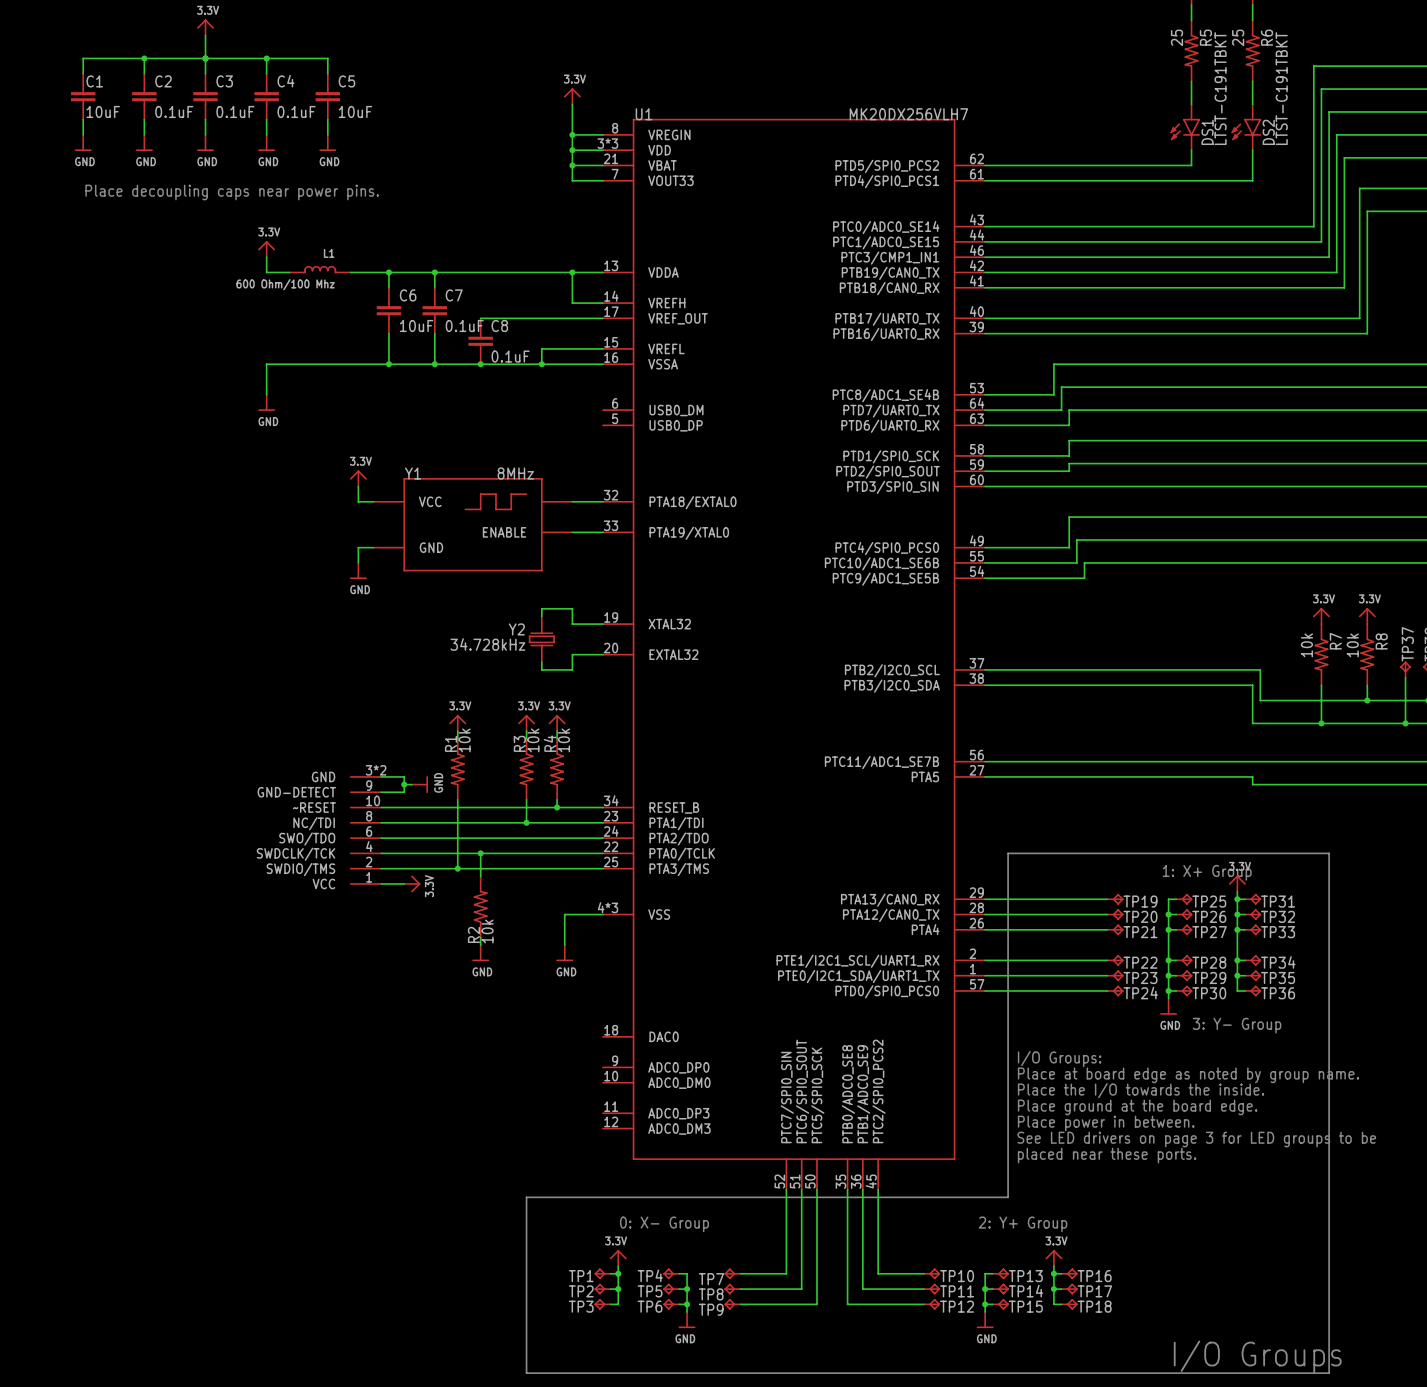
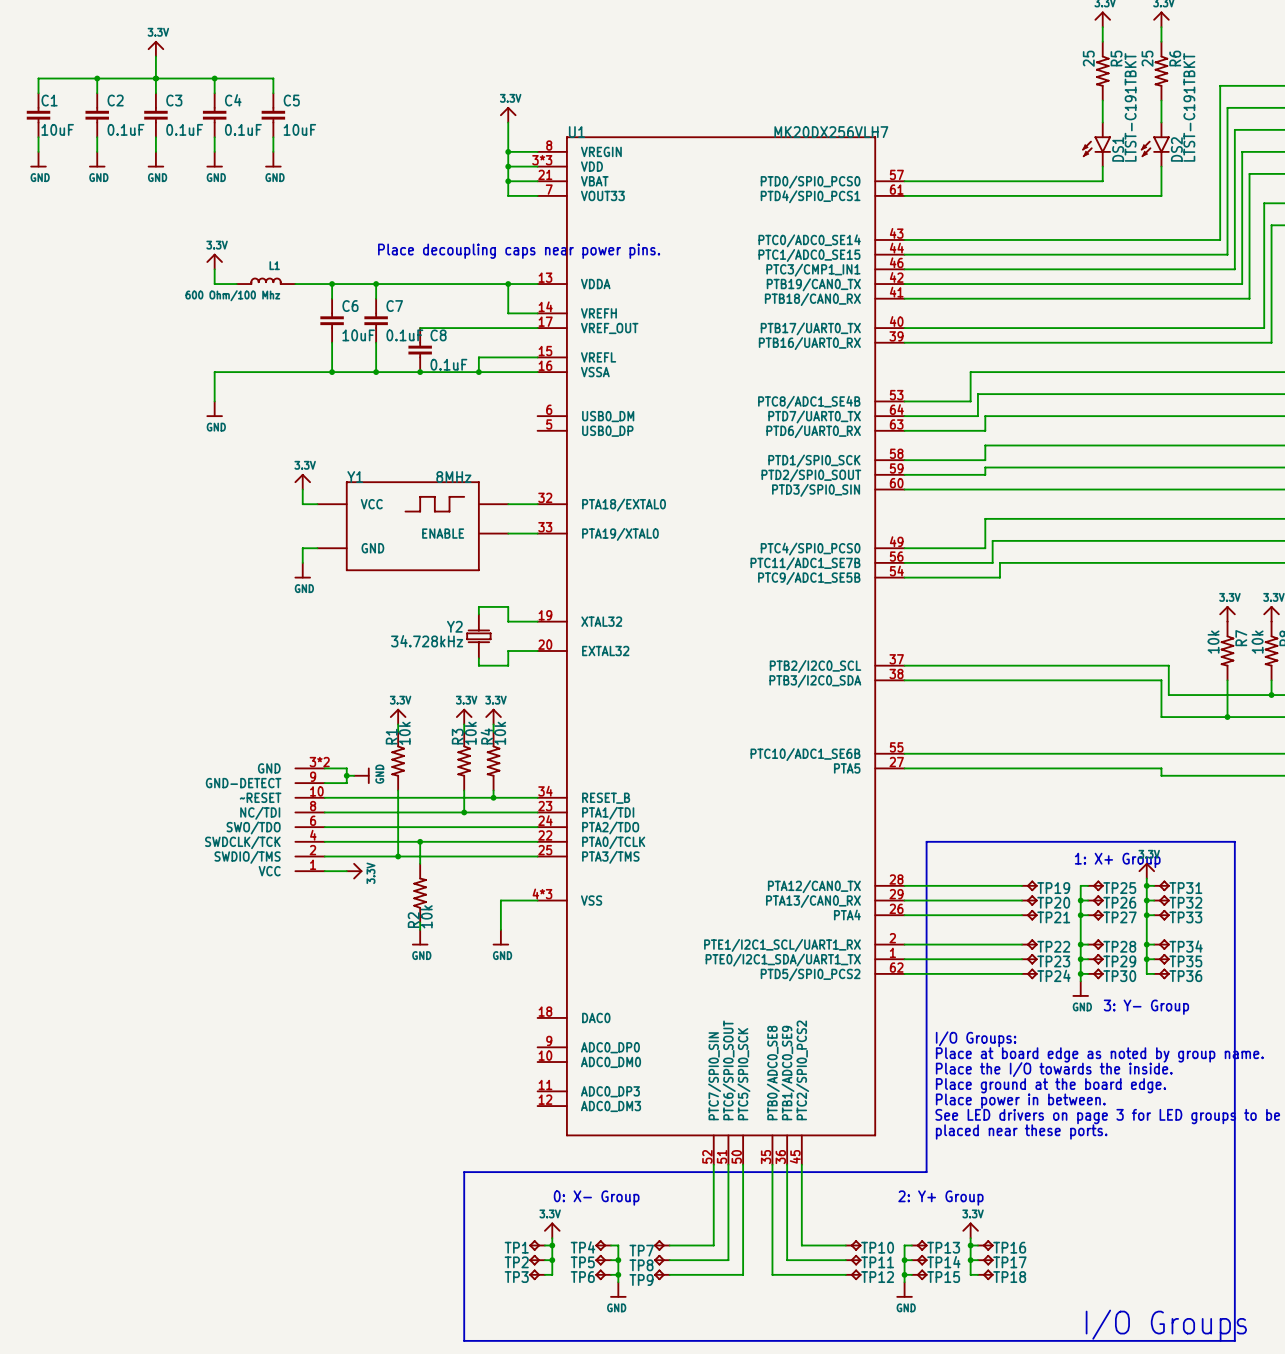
U1 symbol: [602, 118, 986, 1190] -> [537, 136, 905, 1165]
text: Place decoupling caps near power pins. (232, 192) -> none
text: none -> Place decoupling caps near power pins. (519, 251)

